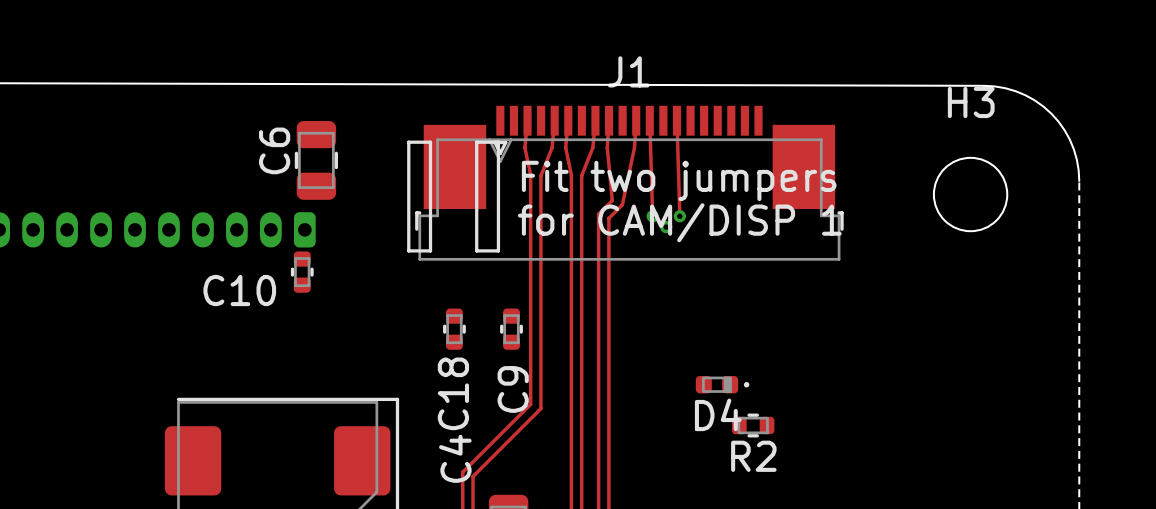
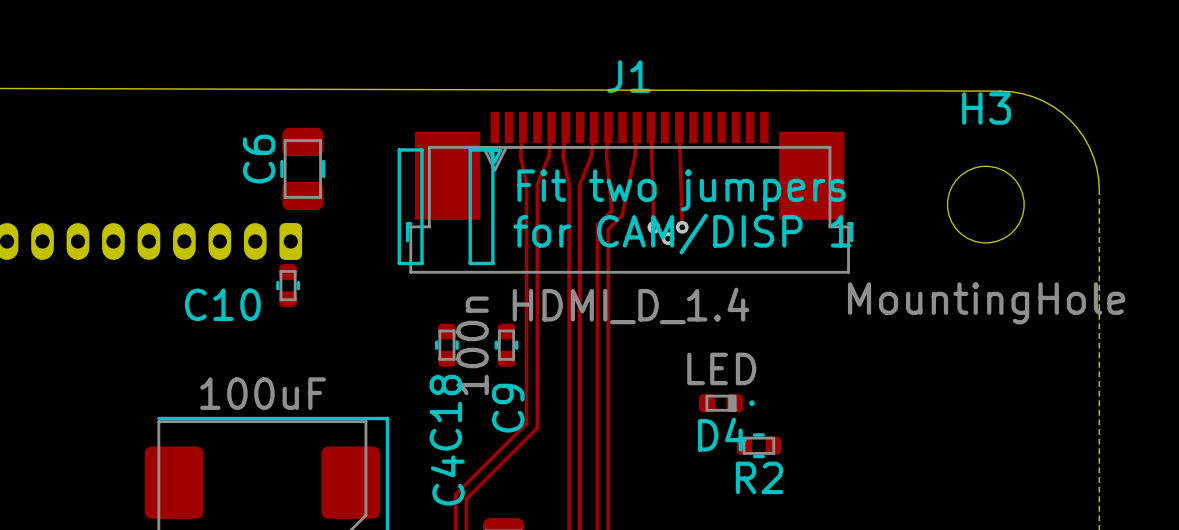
H3 value: none -> MountingHole (986, 303)
J1 value: none -> HDMI_D_1.4 (631, 305)
C9 value: none -> 100n (472, 345)
D4 value: none -> LED (721, 368)
part value: none -> 100uF (263, 393)

